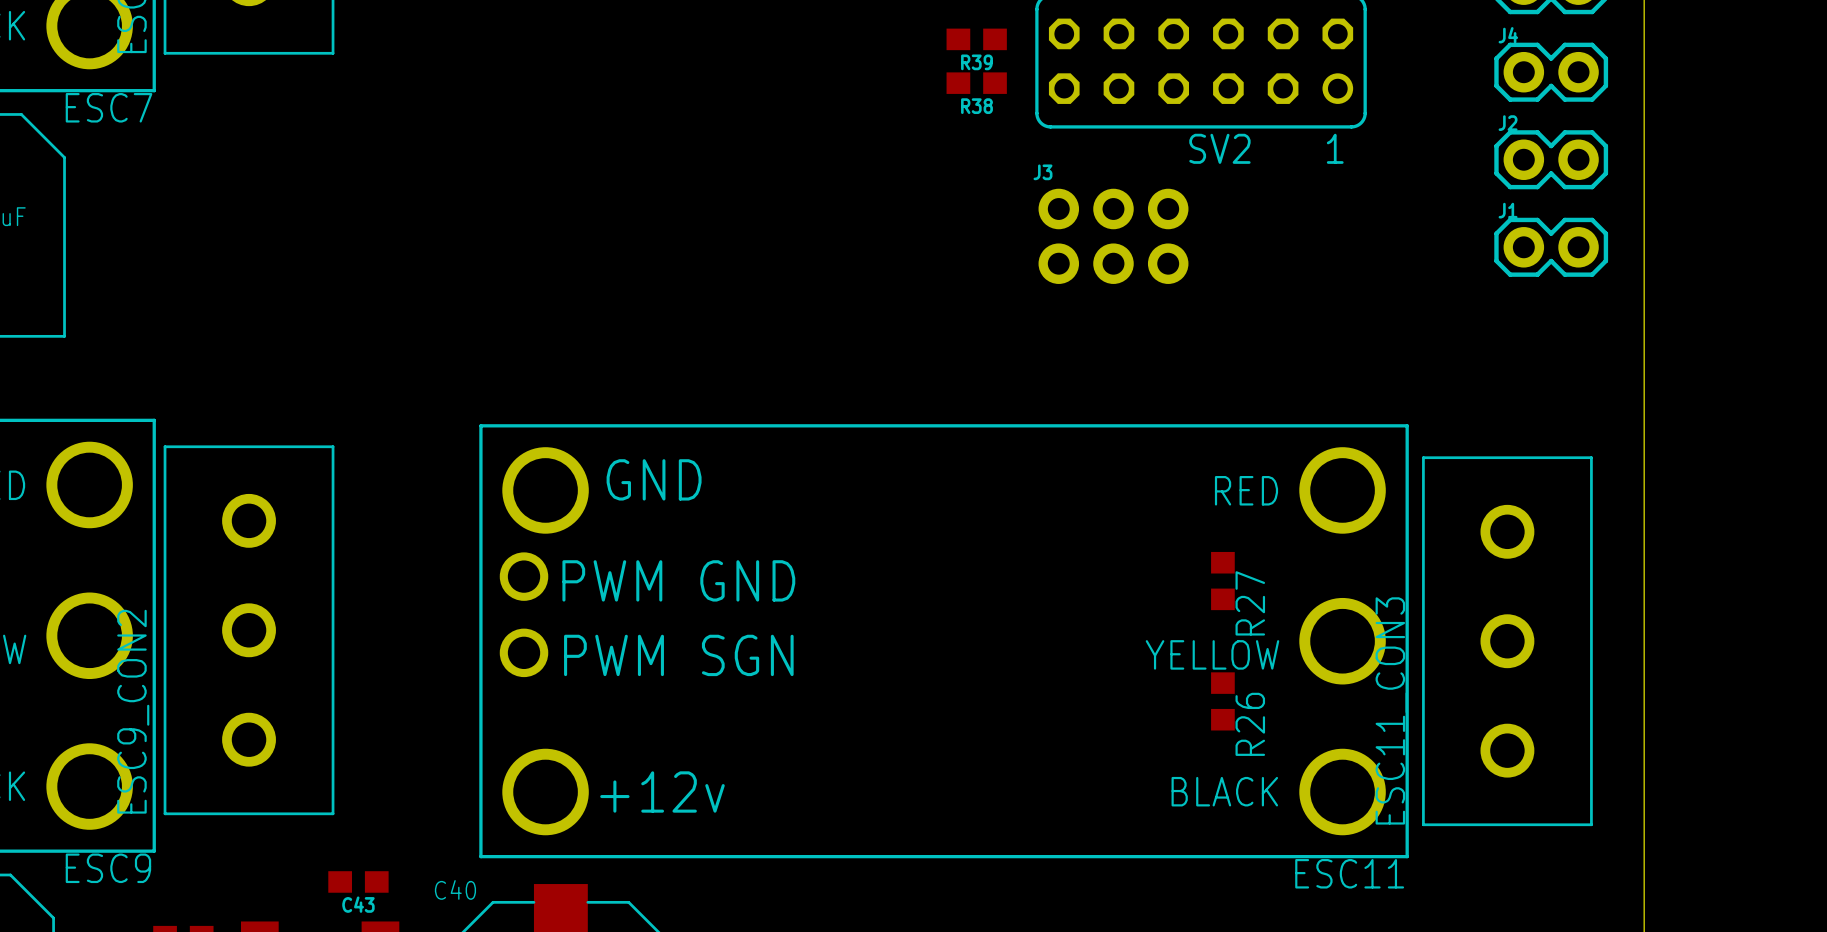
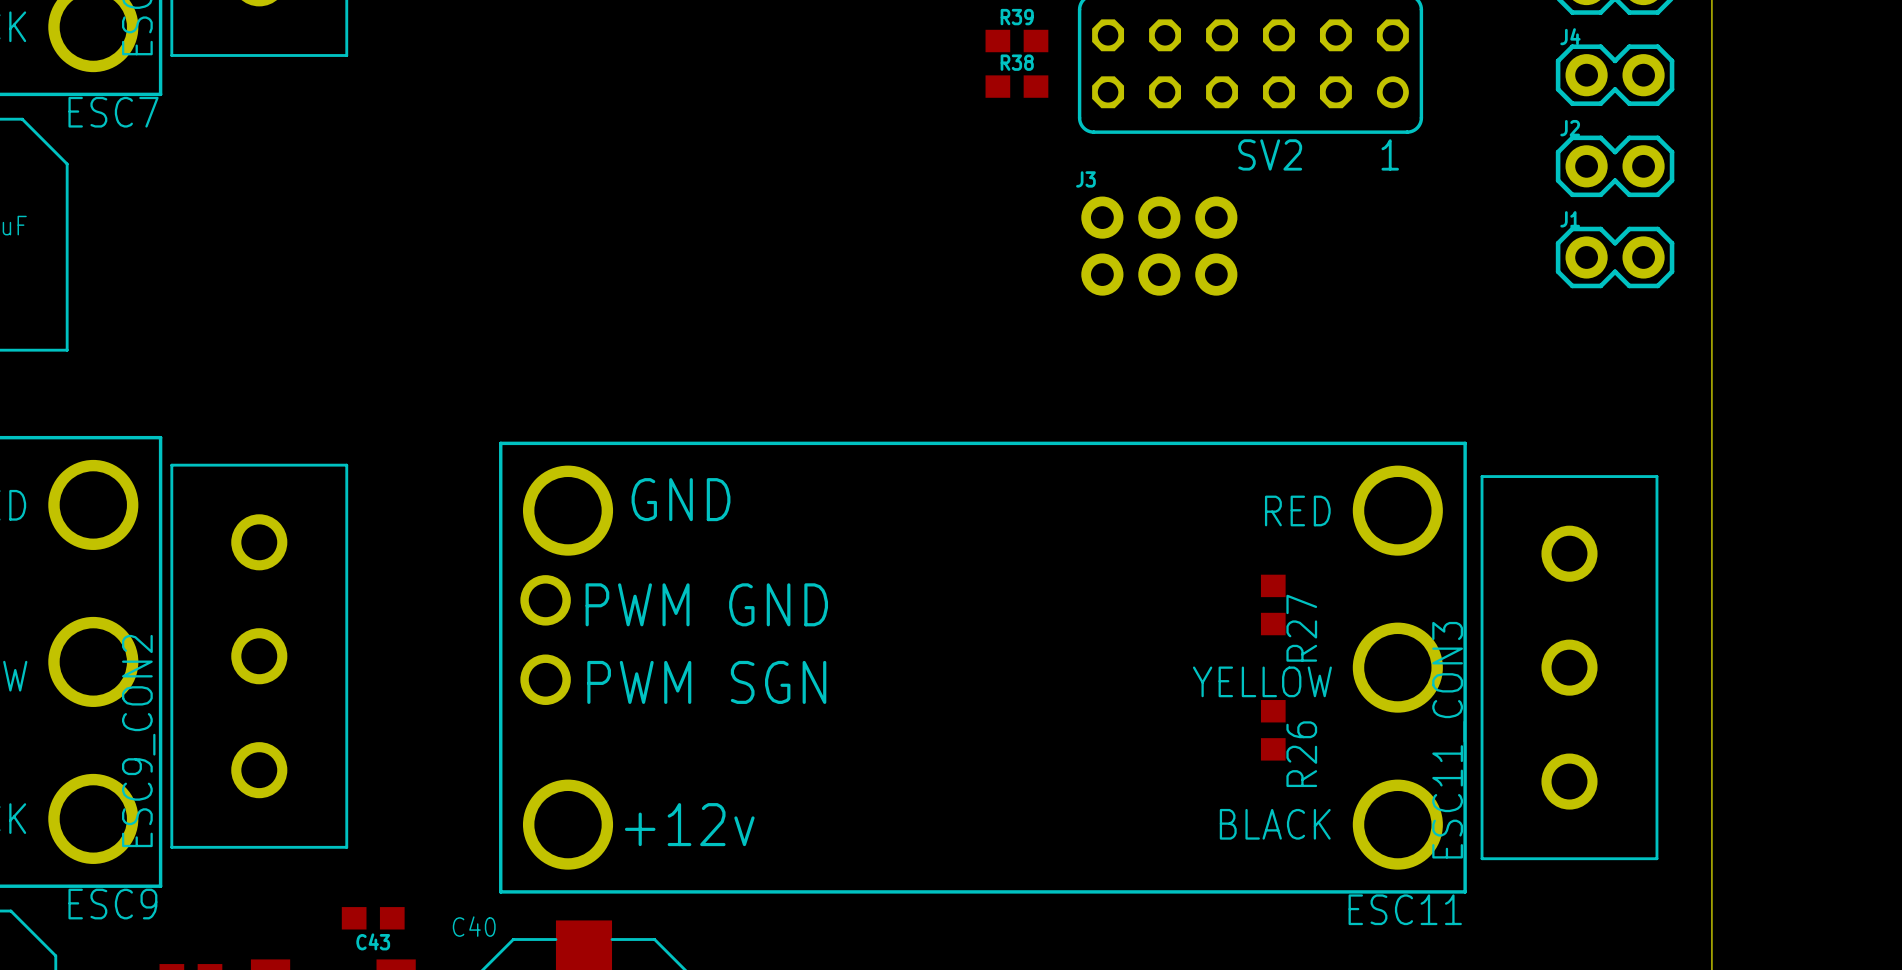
R39 name position: R39 (976, 62) -> R39 (1017, 17)
R38 name position: R38 (976, 106) -> R38 (1017, 62)

